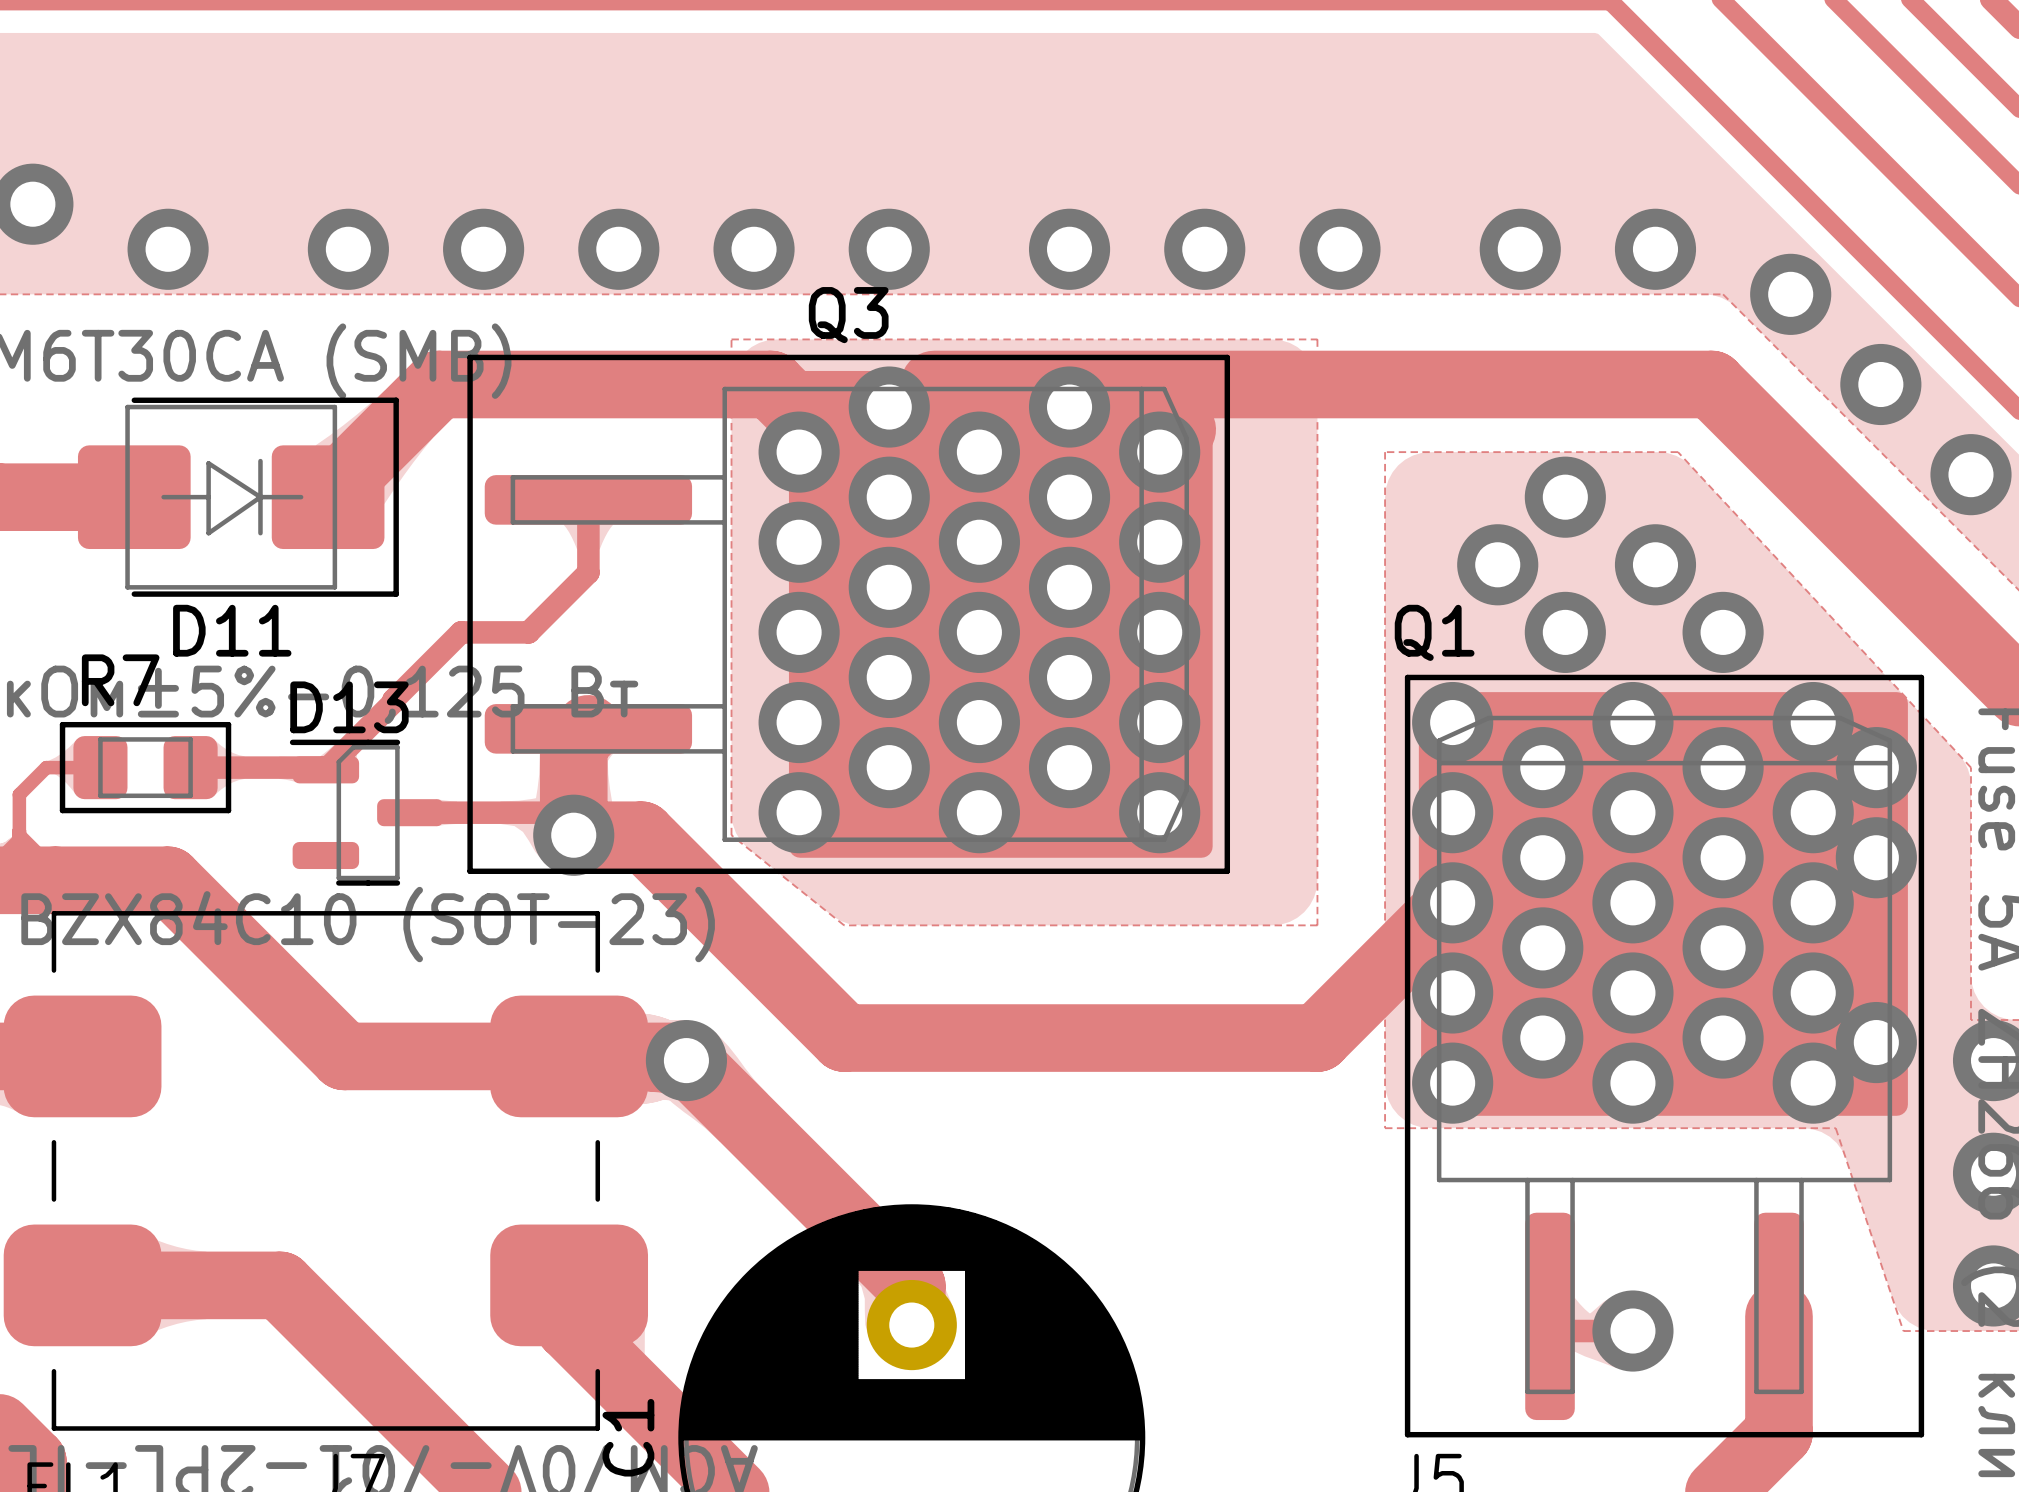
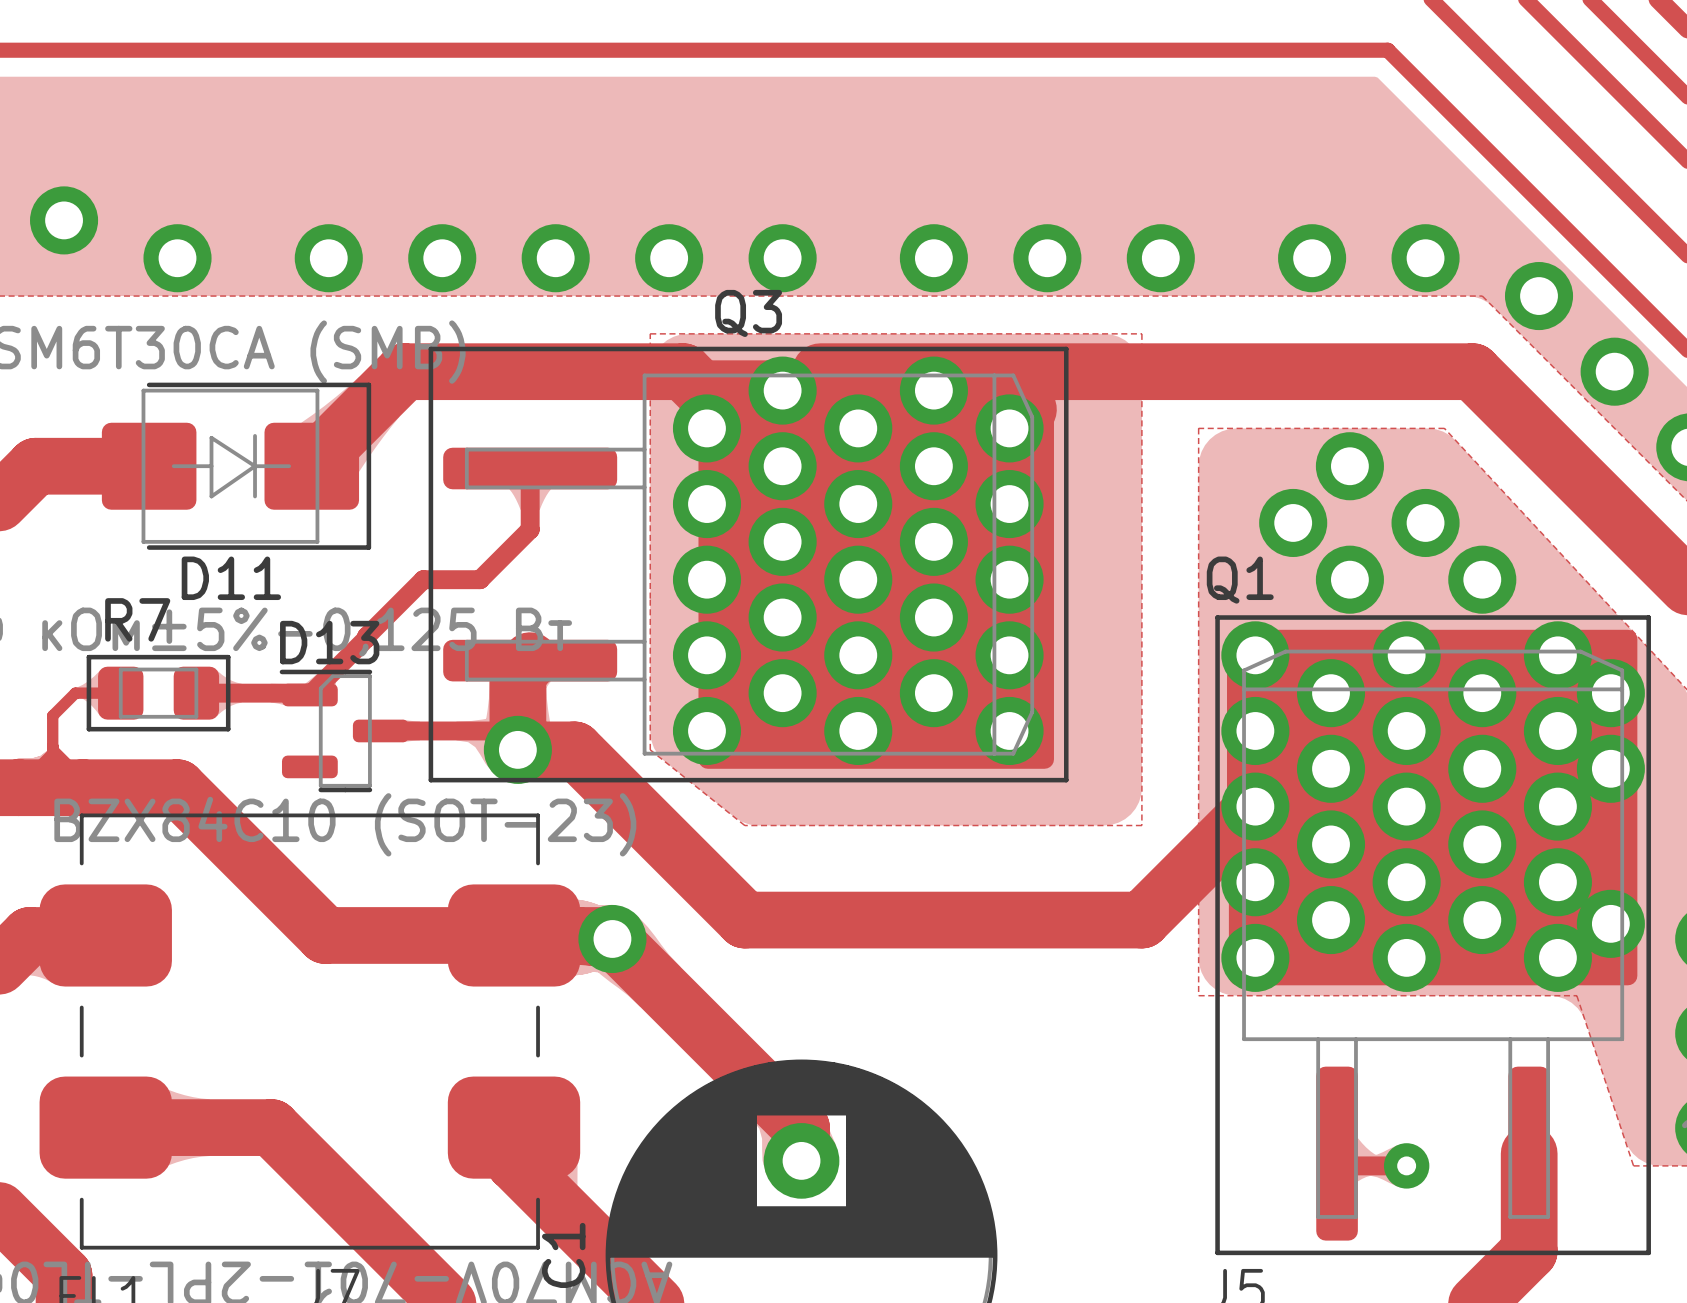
via size: [1592, 1290, 1674, 1372] -> [1383, 1143, 1430, 1189]

